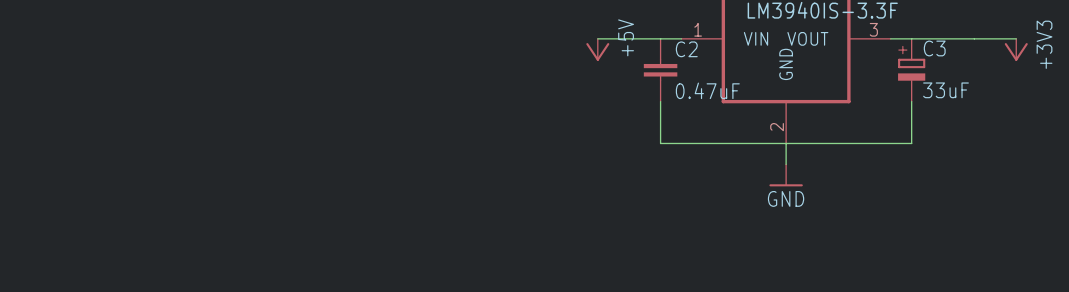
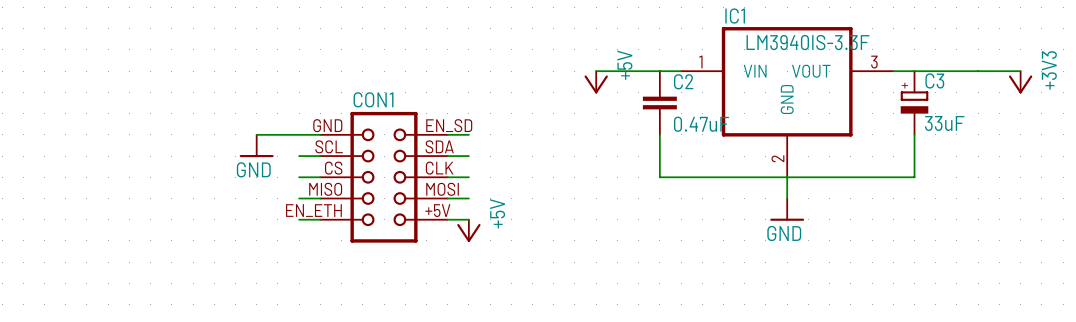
wire: none -> (256, 134) (320, 134)
wire: none -> (447, 134) (468, 134)
power symbol: none -> GND (256, 145)
wire: none -> (299, 156) (320, 156)
wire: none -> (447, 156) (468, 156)
wire: none -> (299, 177) (320, 177)
CON1: none -> (384, 177)
wire: none -> (447, 177) (468, 177)
wire: none -> (299, 198) (320, 198)
wire: none -> (447, 198) (468, 198)
wire: none -> (299, 219) (320, 219)
wire: none -> (447, 219) (468, 219)
power symbol: none -> +5V (468, 230)

